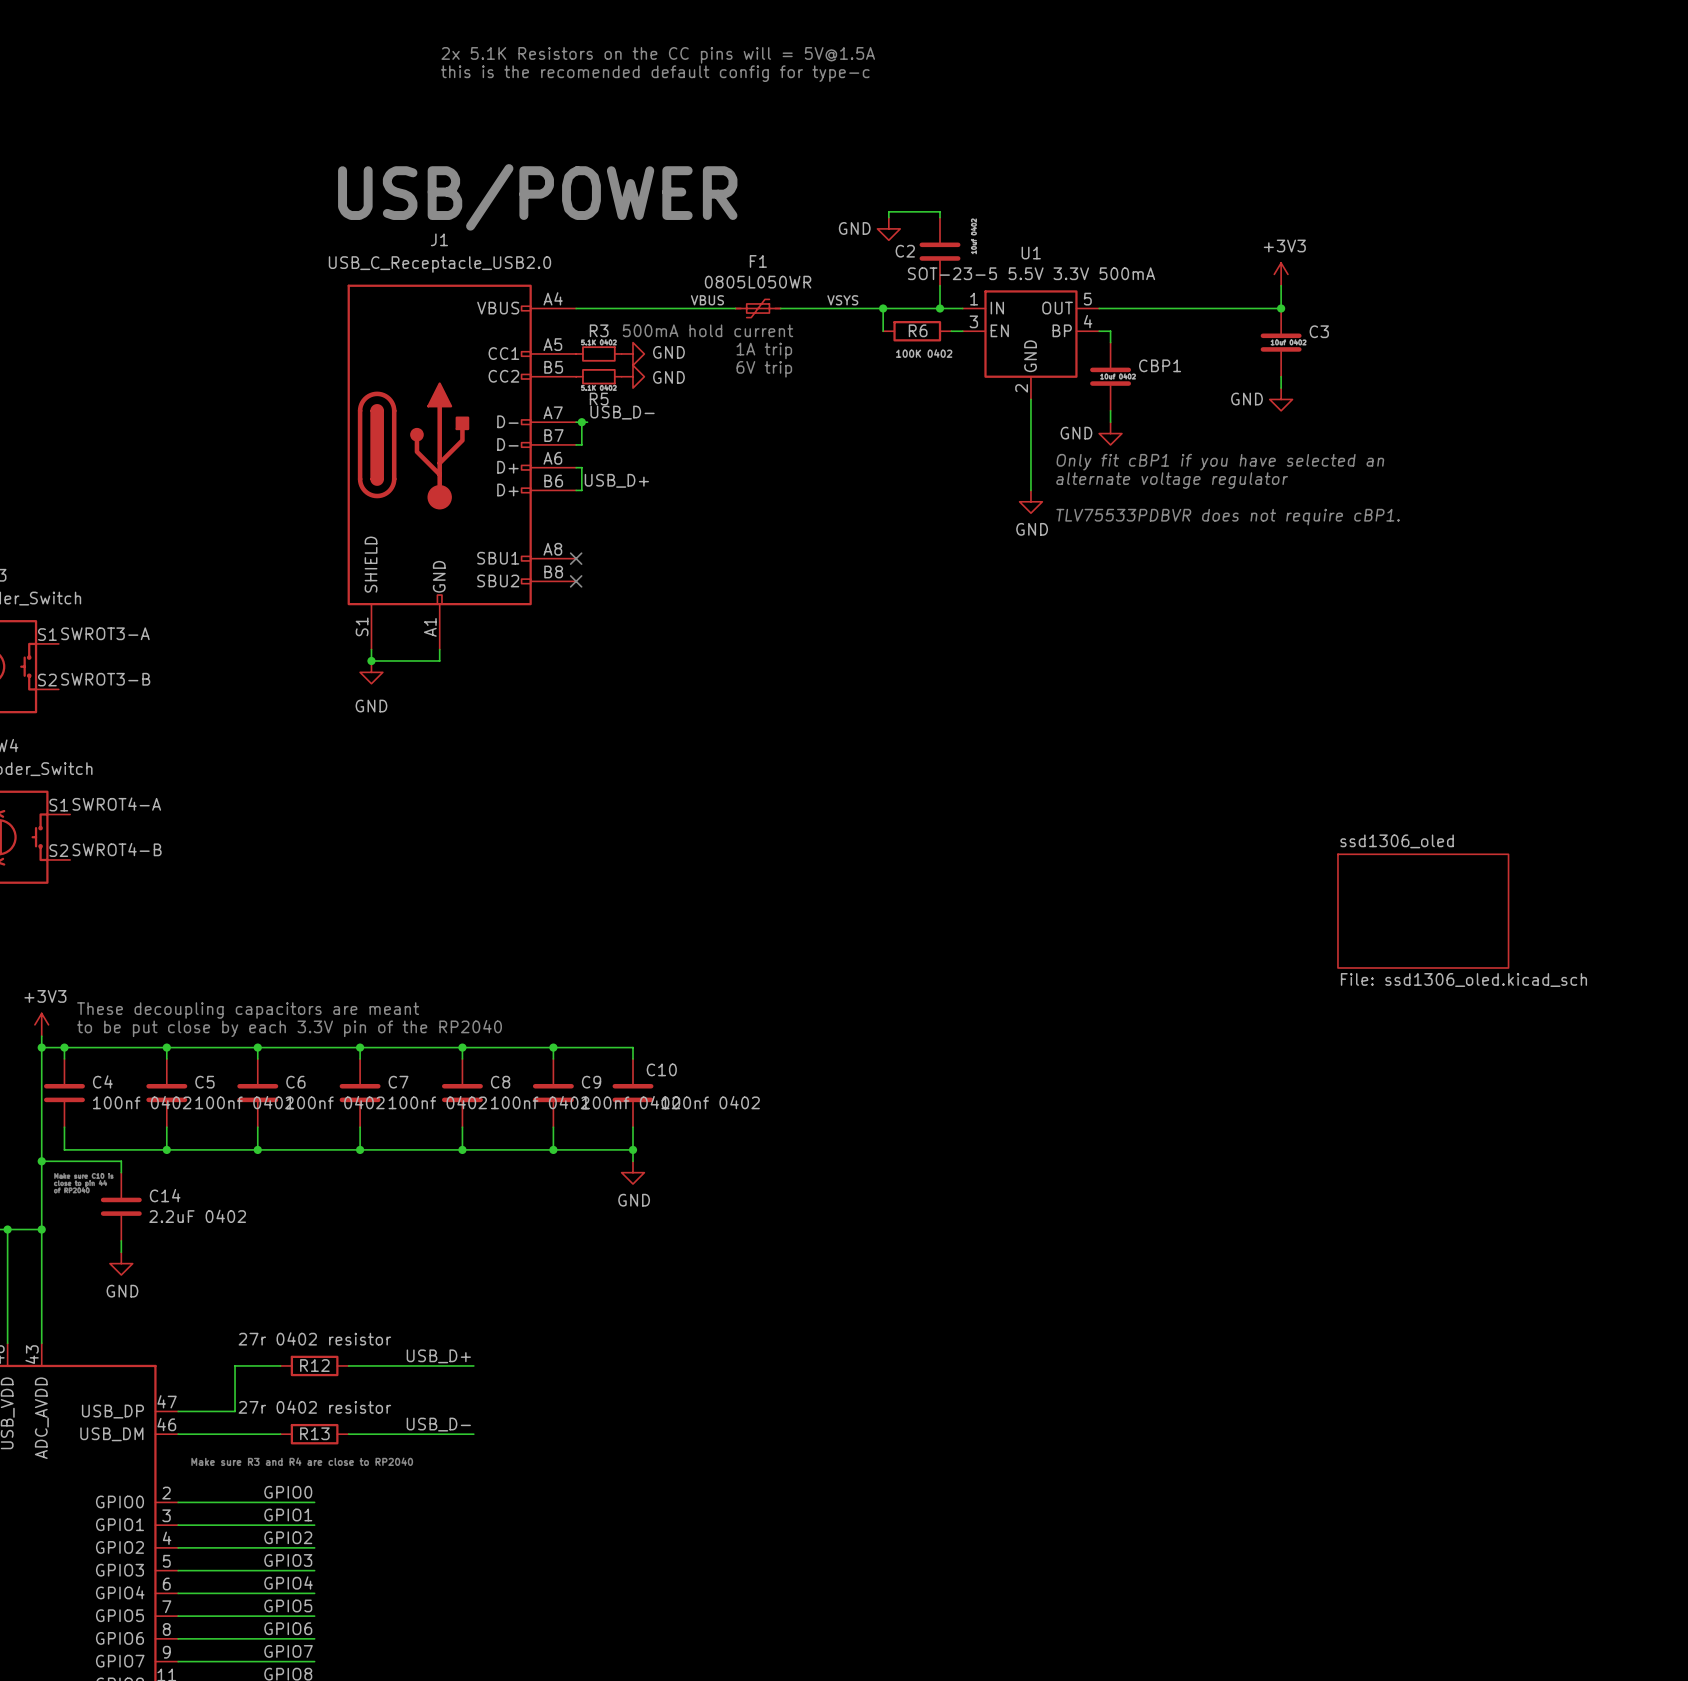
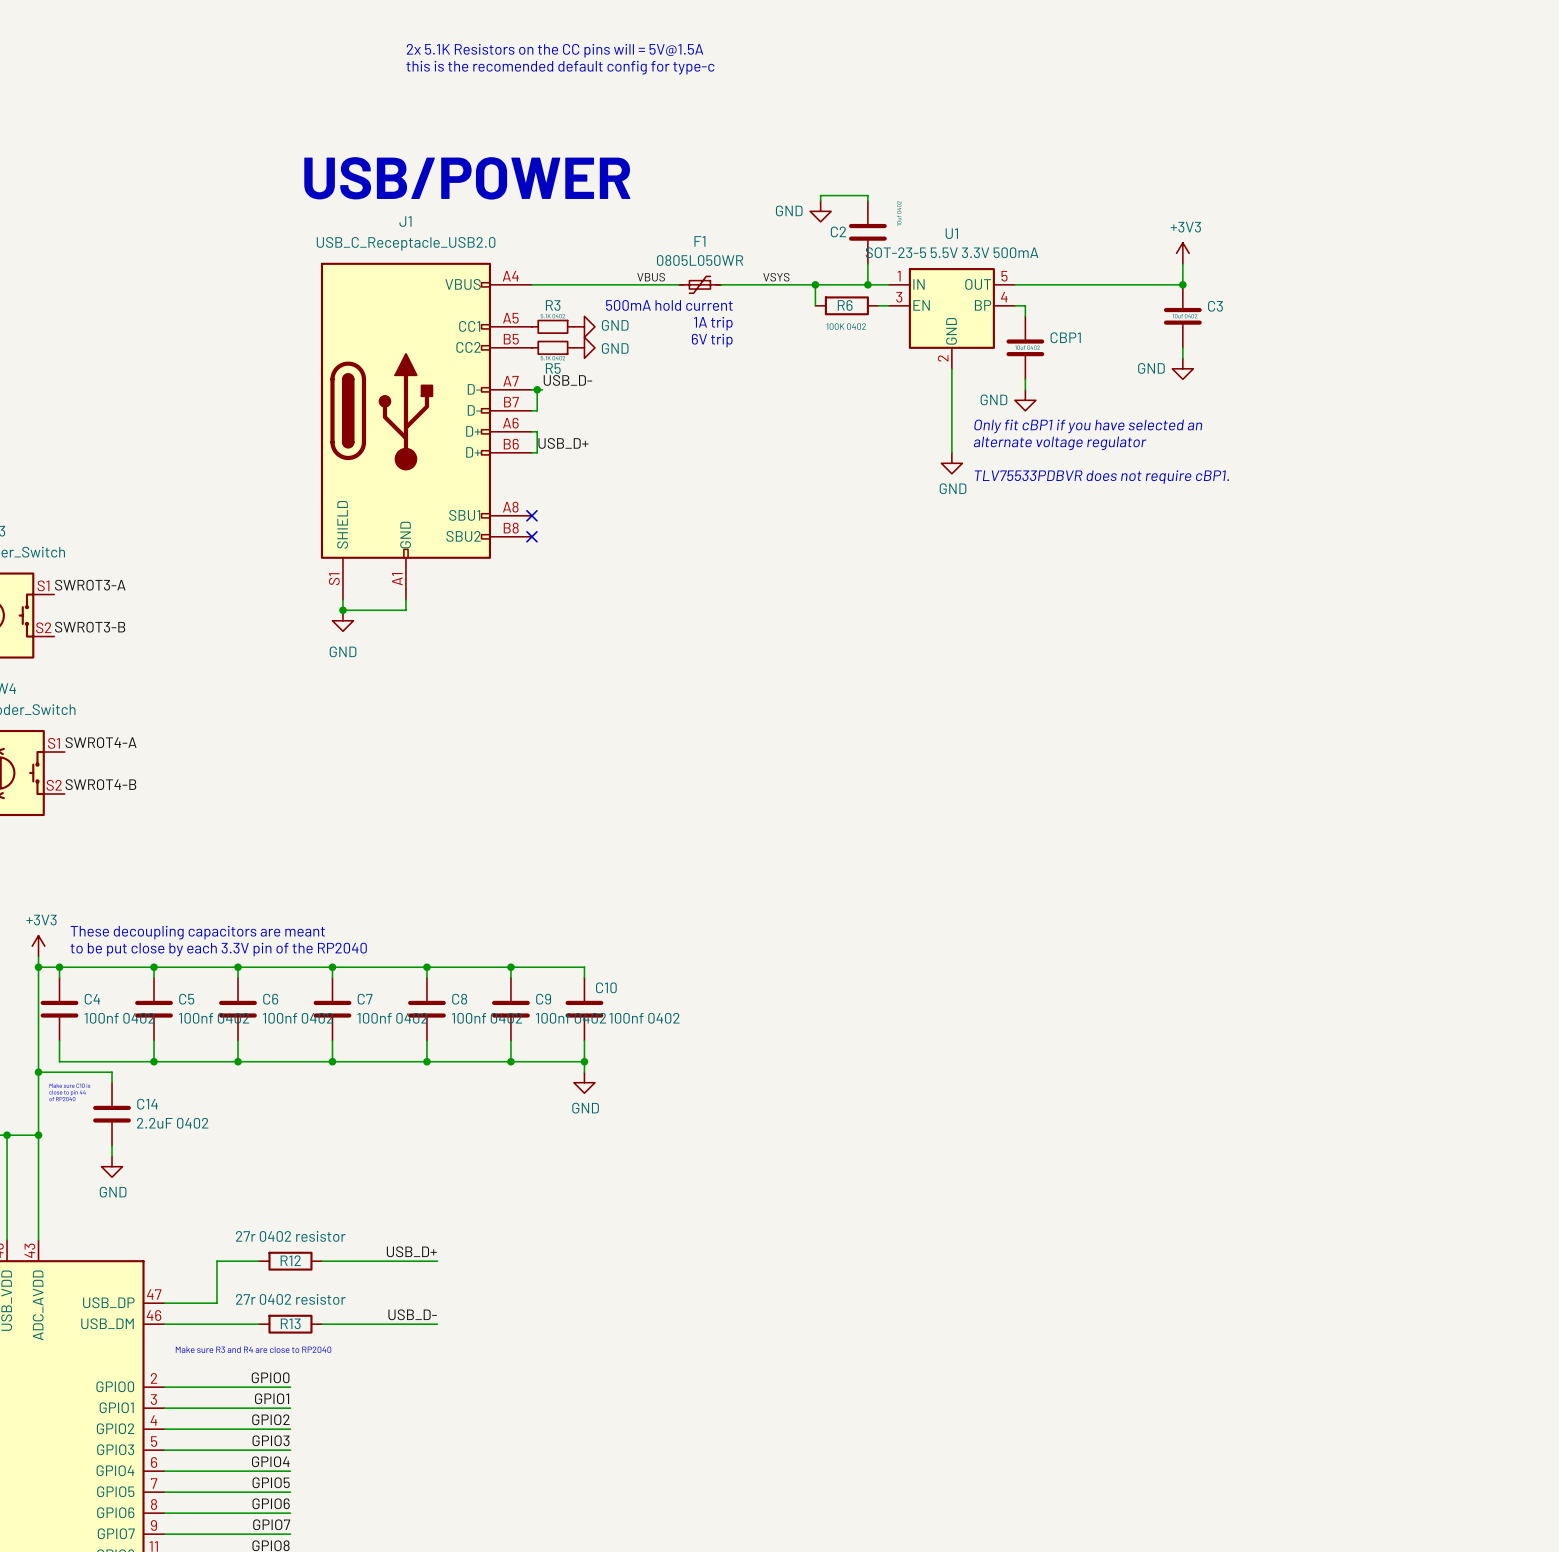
sheet ssd1306_oled: File: ssd1306_oled.kicad_sch (1423, 911) -> none

